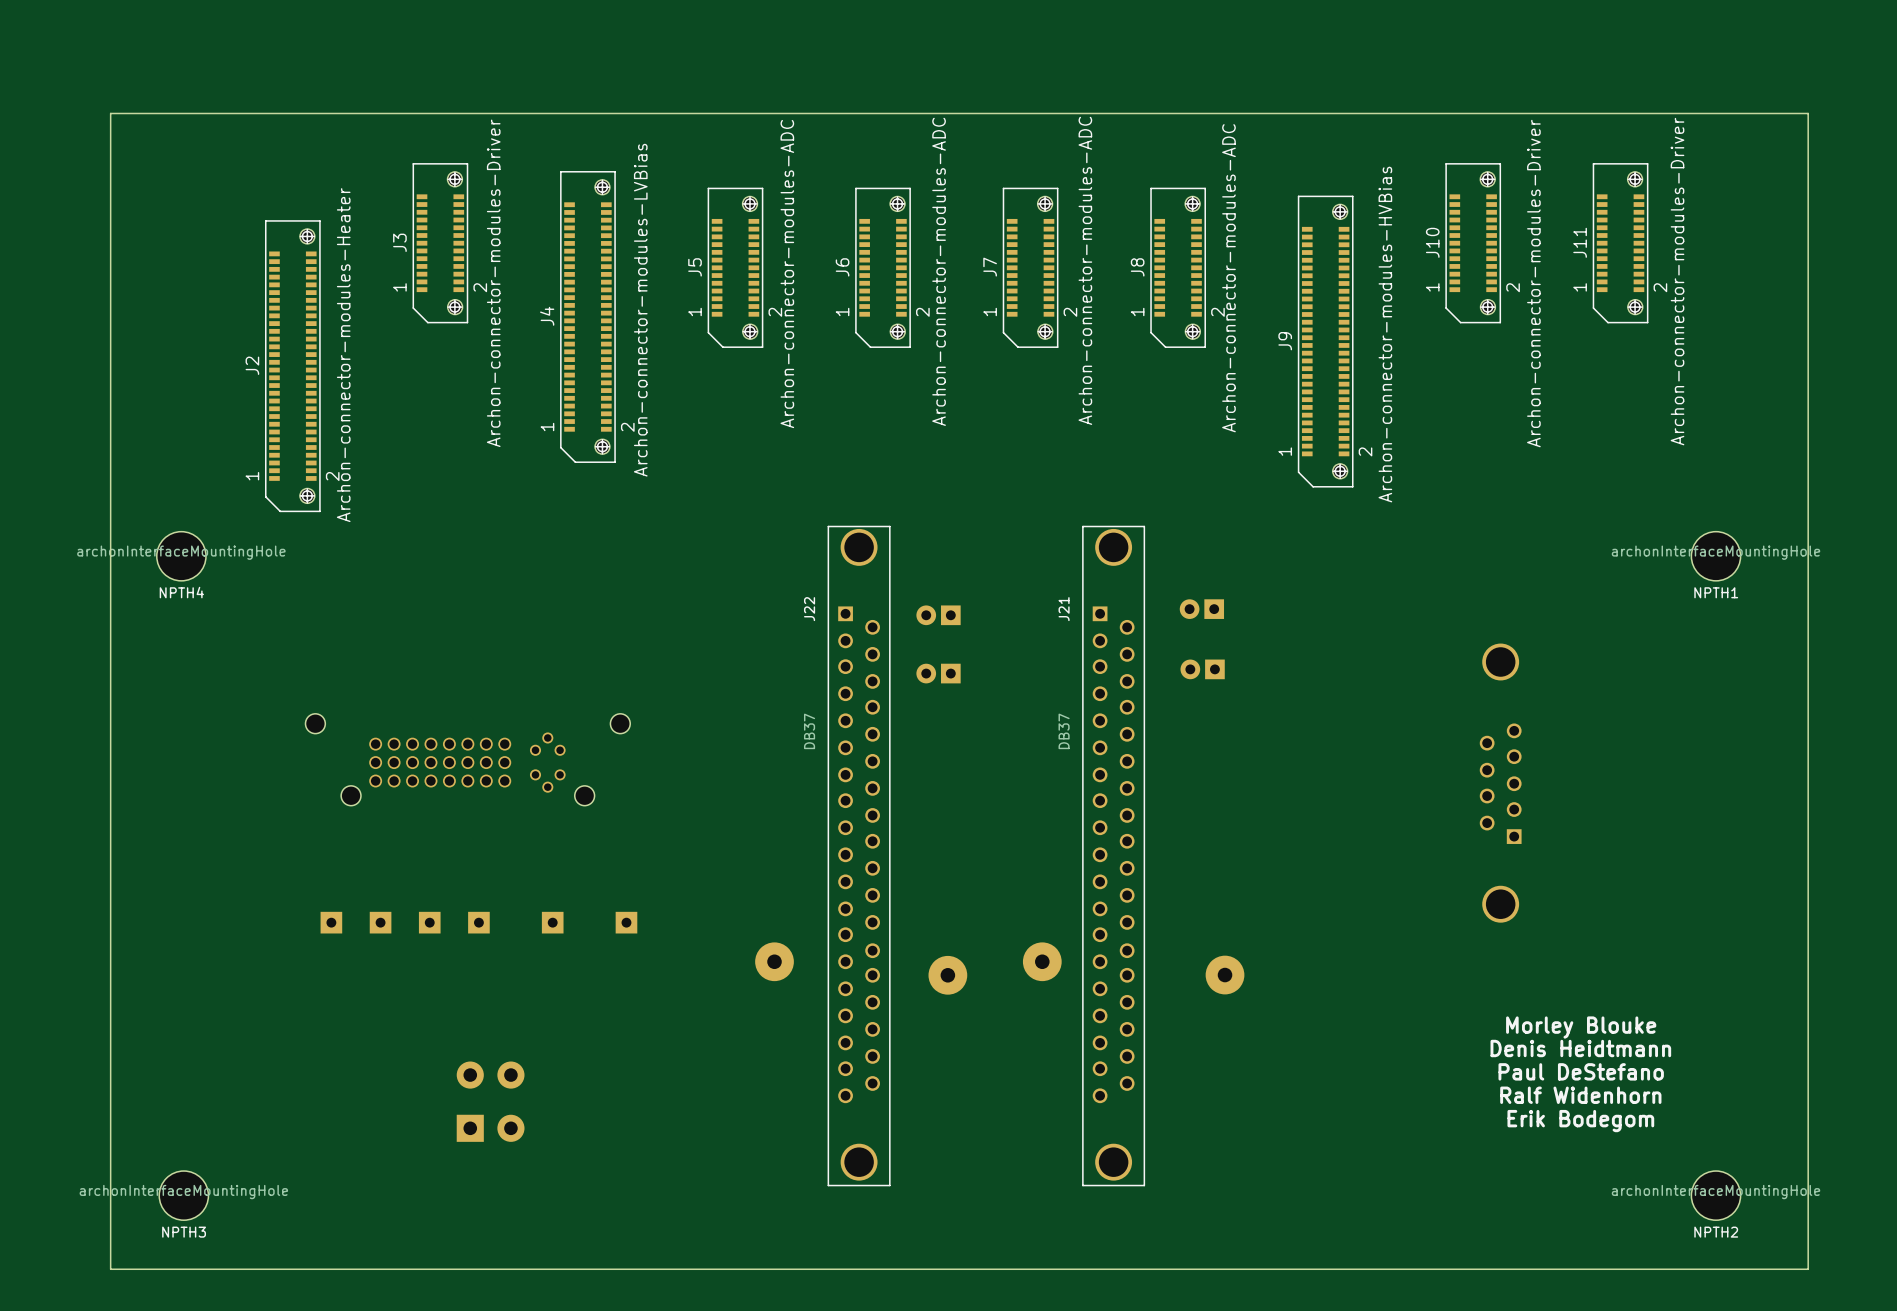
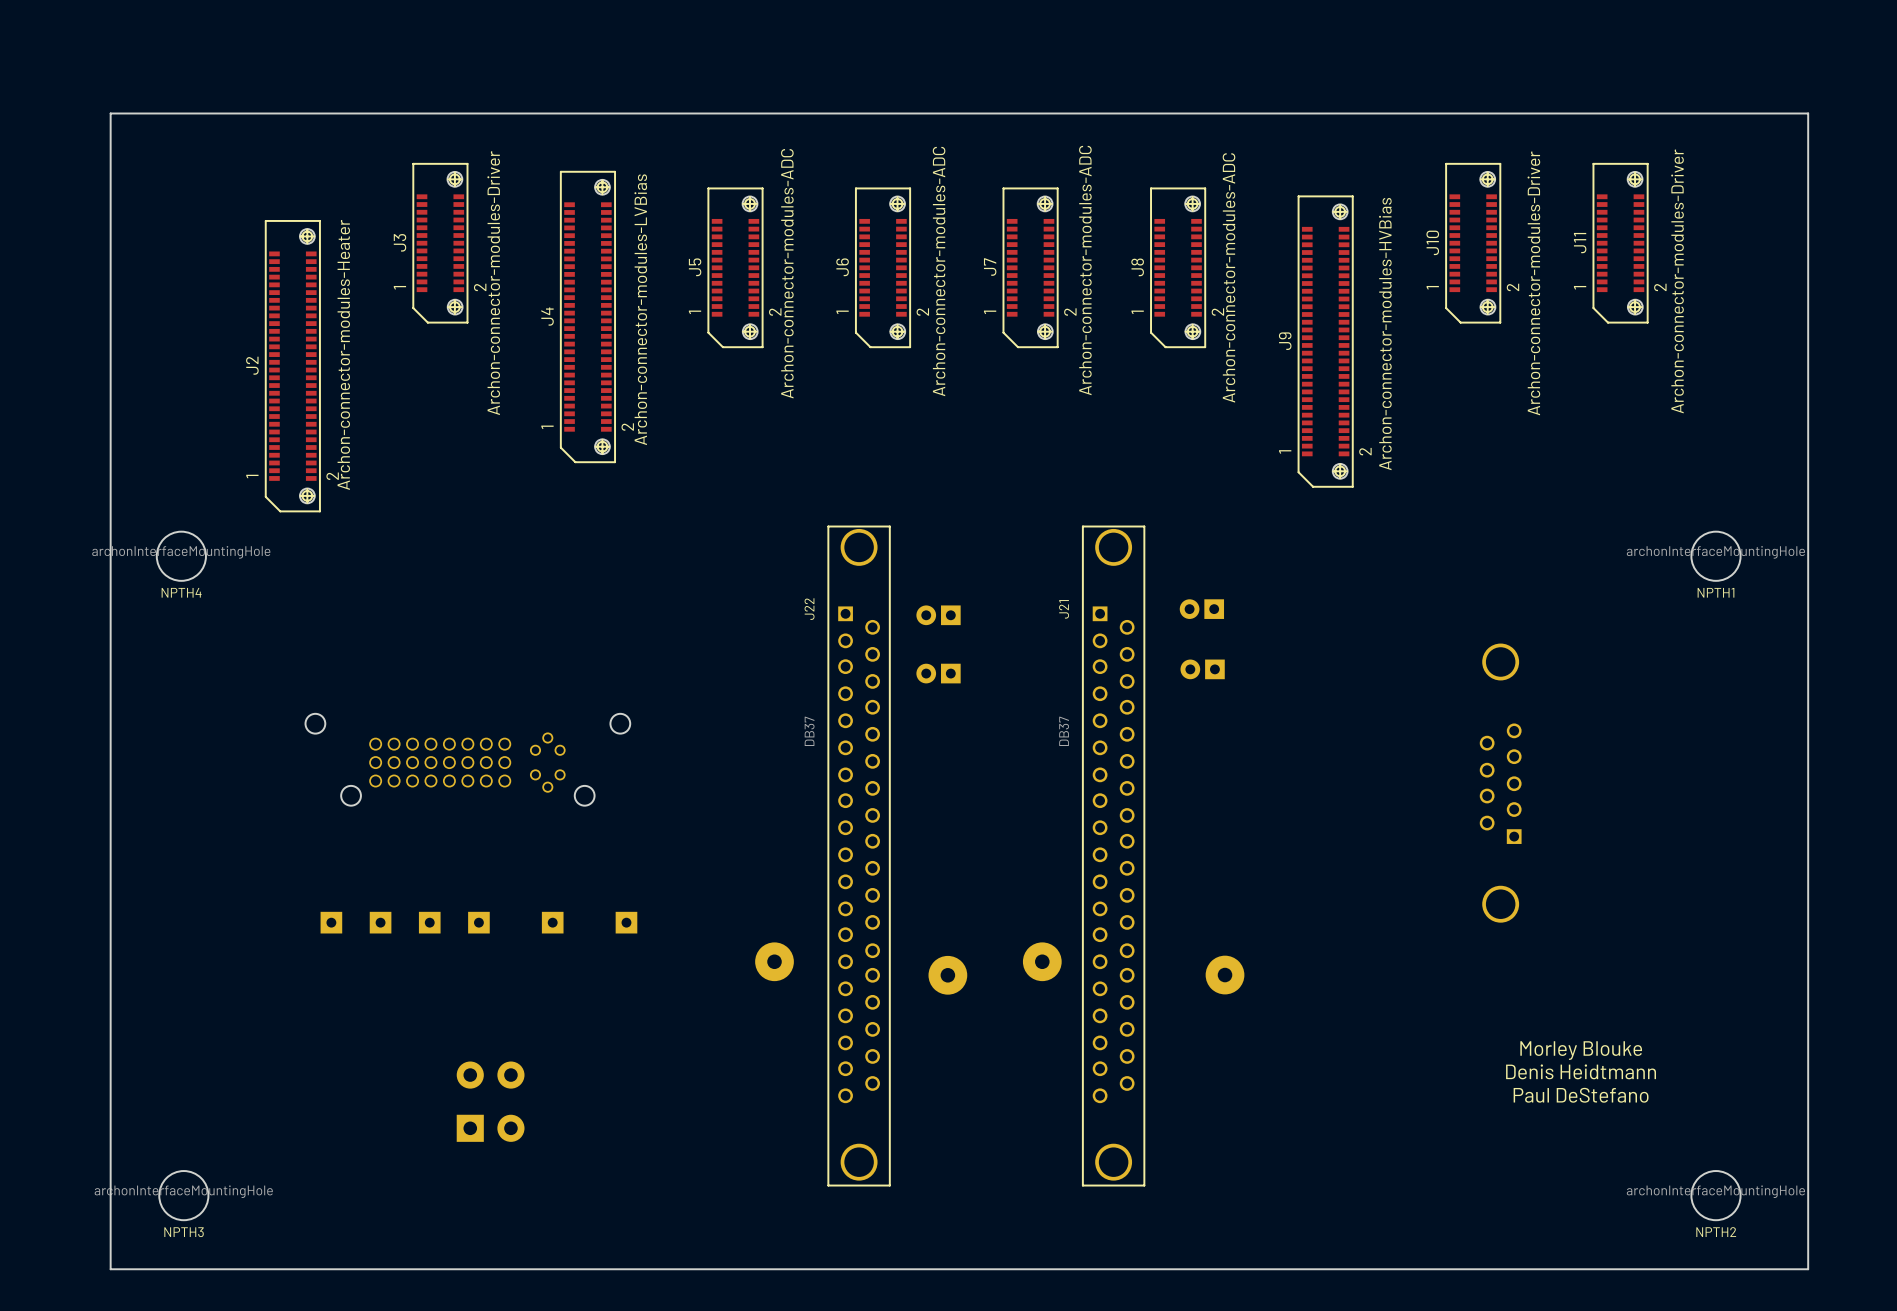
text: Morley Blouke (1581, 1027) -> none
text: Denis Heidtmann (1580, 1048) -> Morley Blouke (1581, 1050)
text: Paul DeStefano (1581, 1071) -> Denis Heidtmann (1581, 1071)
text: Ralf Widenhorn (1580, 1095) -> Paul DeStefano (1581, 1095)
text: Erik Bodegom (1580, 1121) -> none

